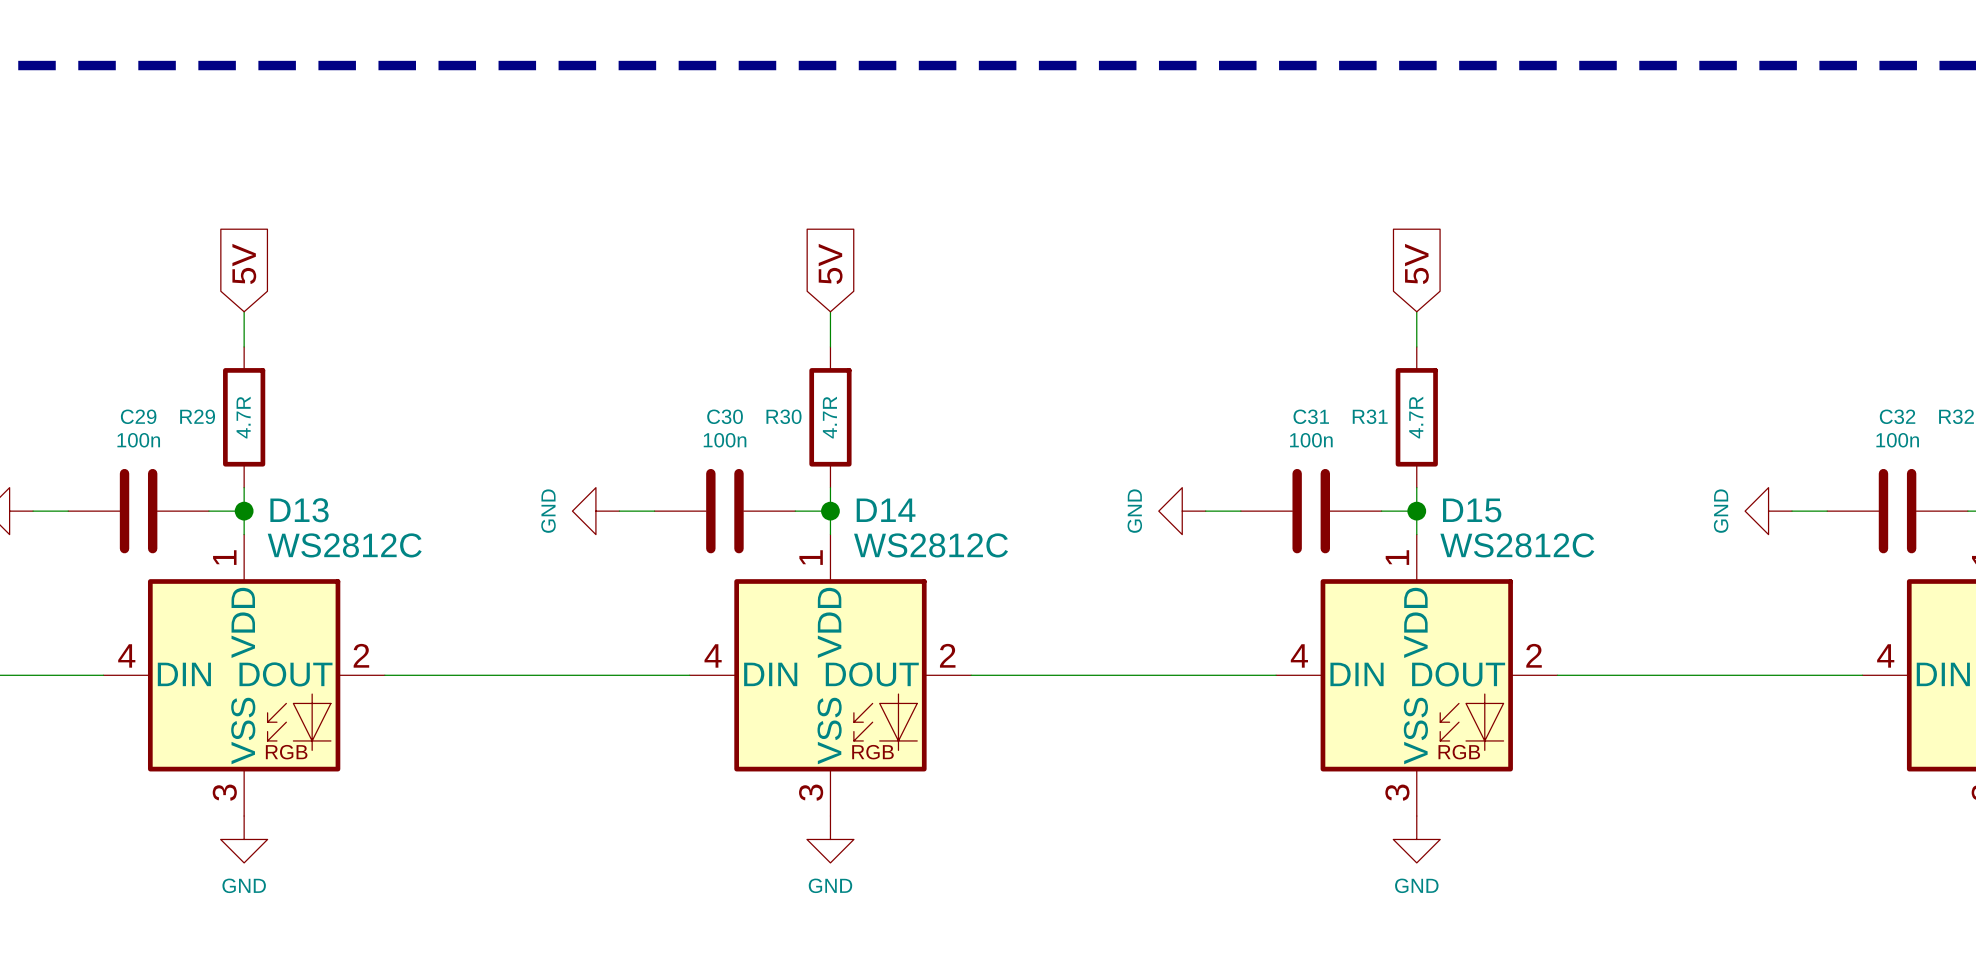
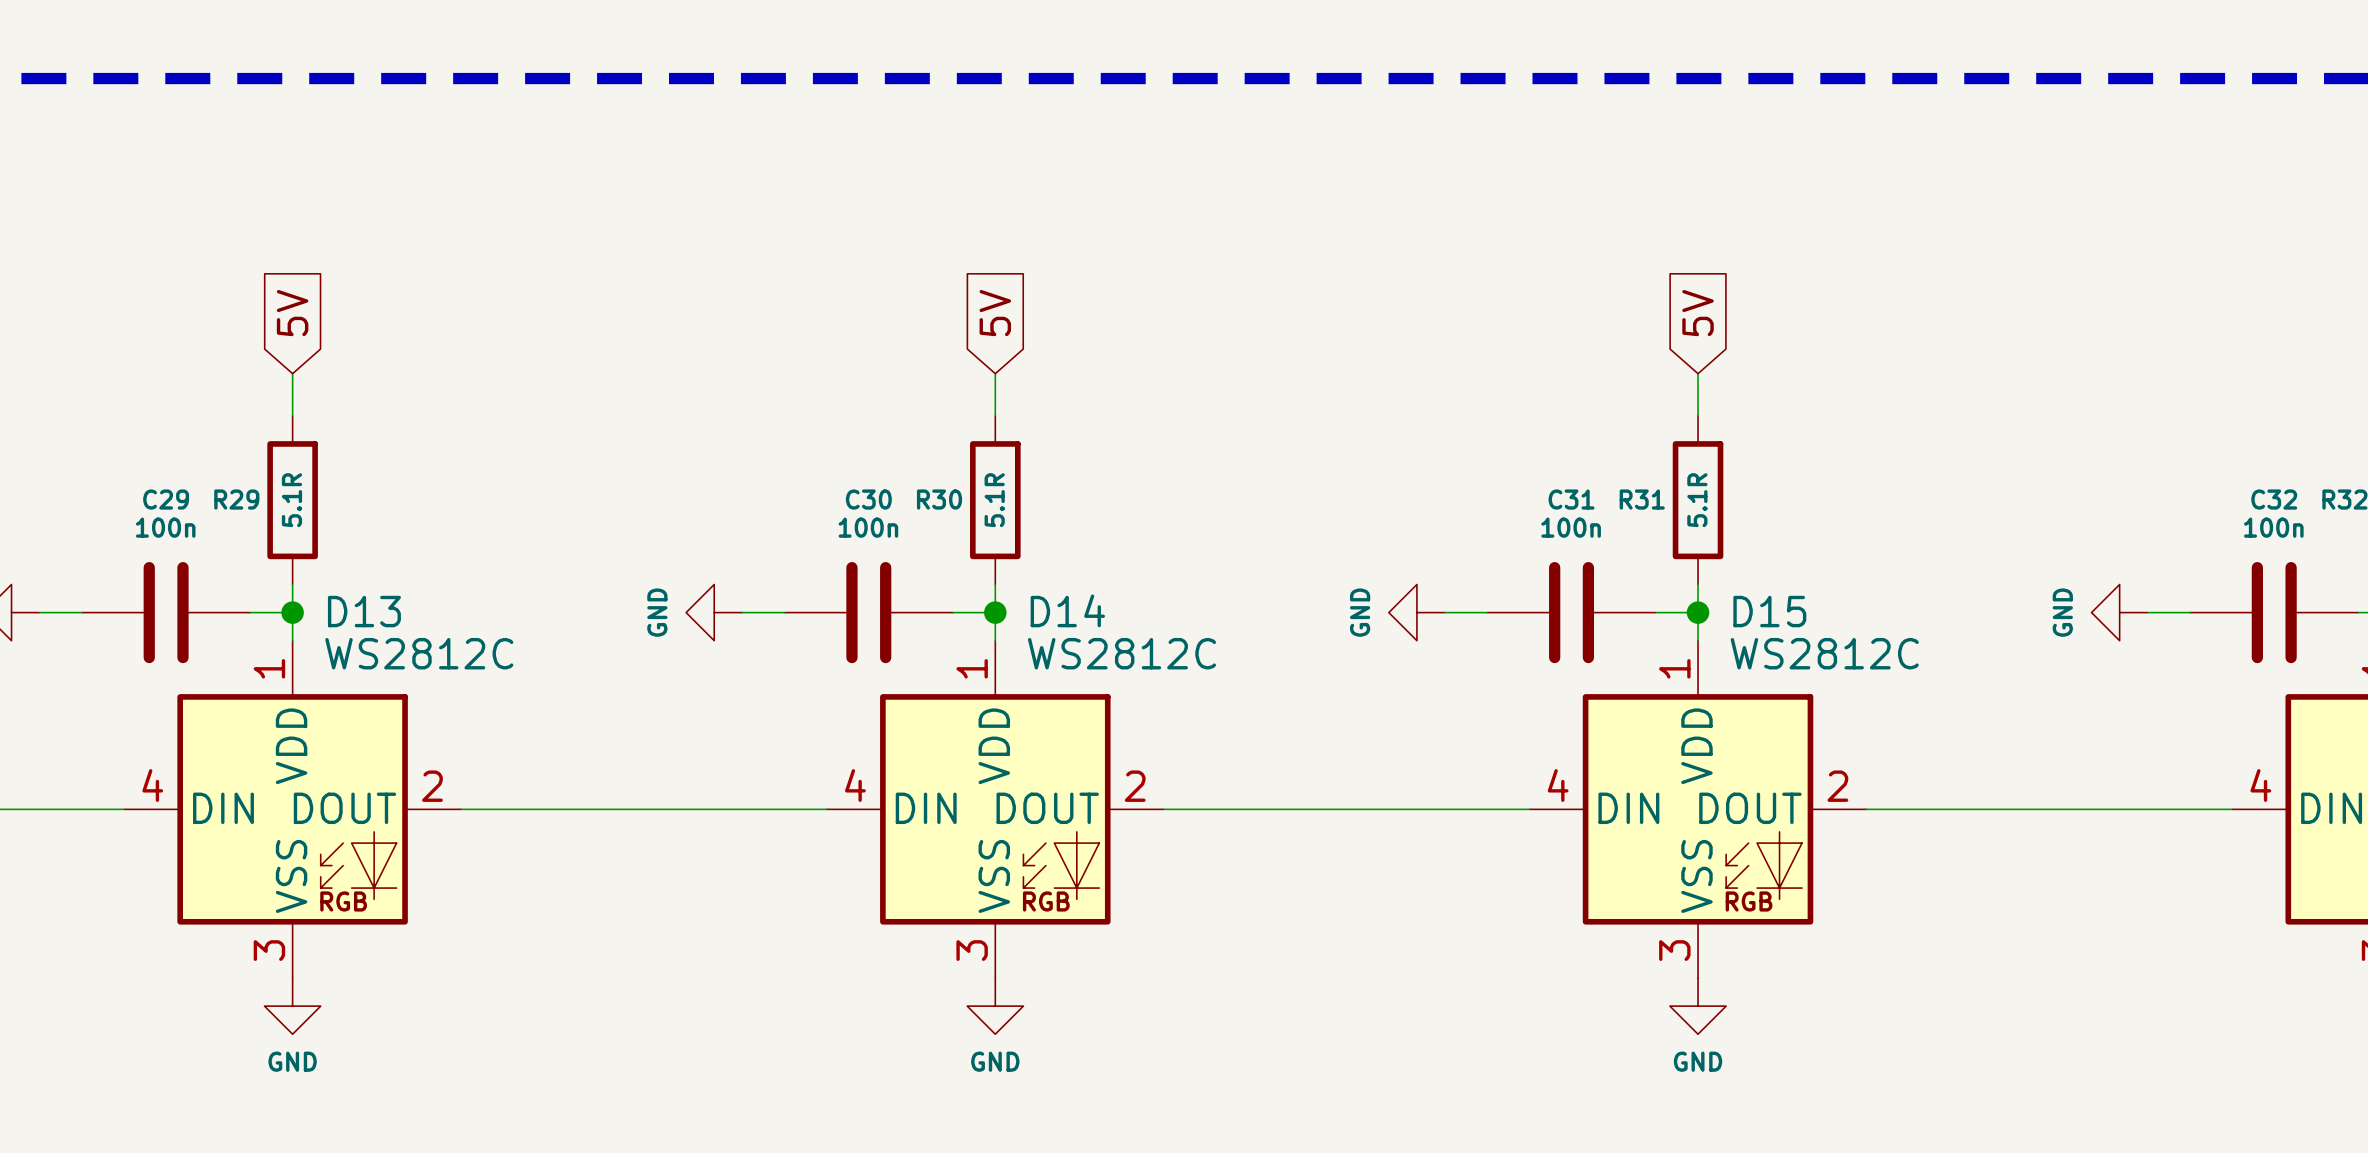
R29 value: 4.7R (243, 417) -> 5.1R (291, 500)
R30 value: 4.7R (829, 417) -> 5.1R (994, 500)
R31 value: 4.7R (1416, 417) -> 5.1R (1697, 500)

